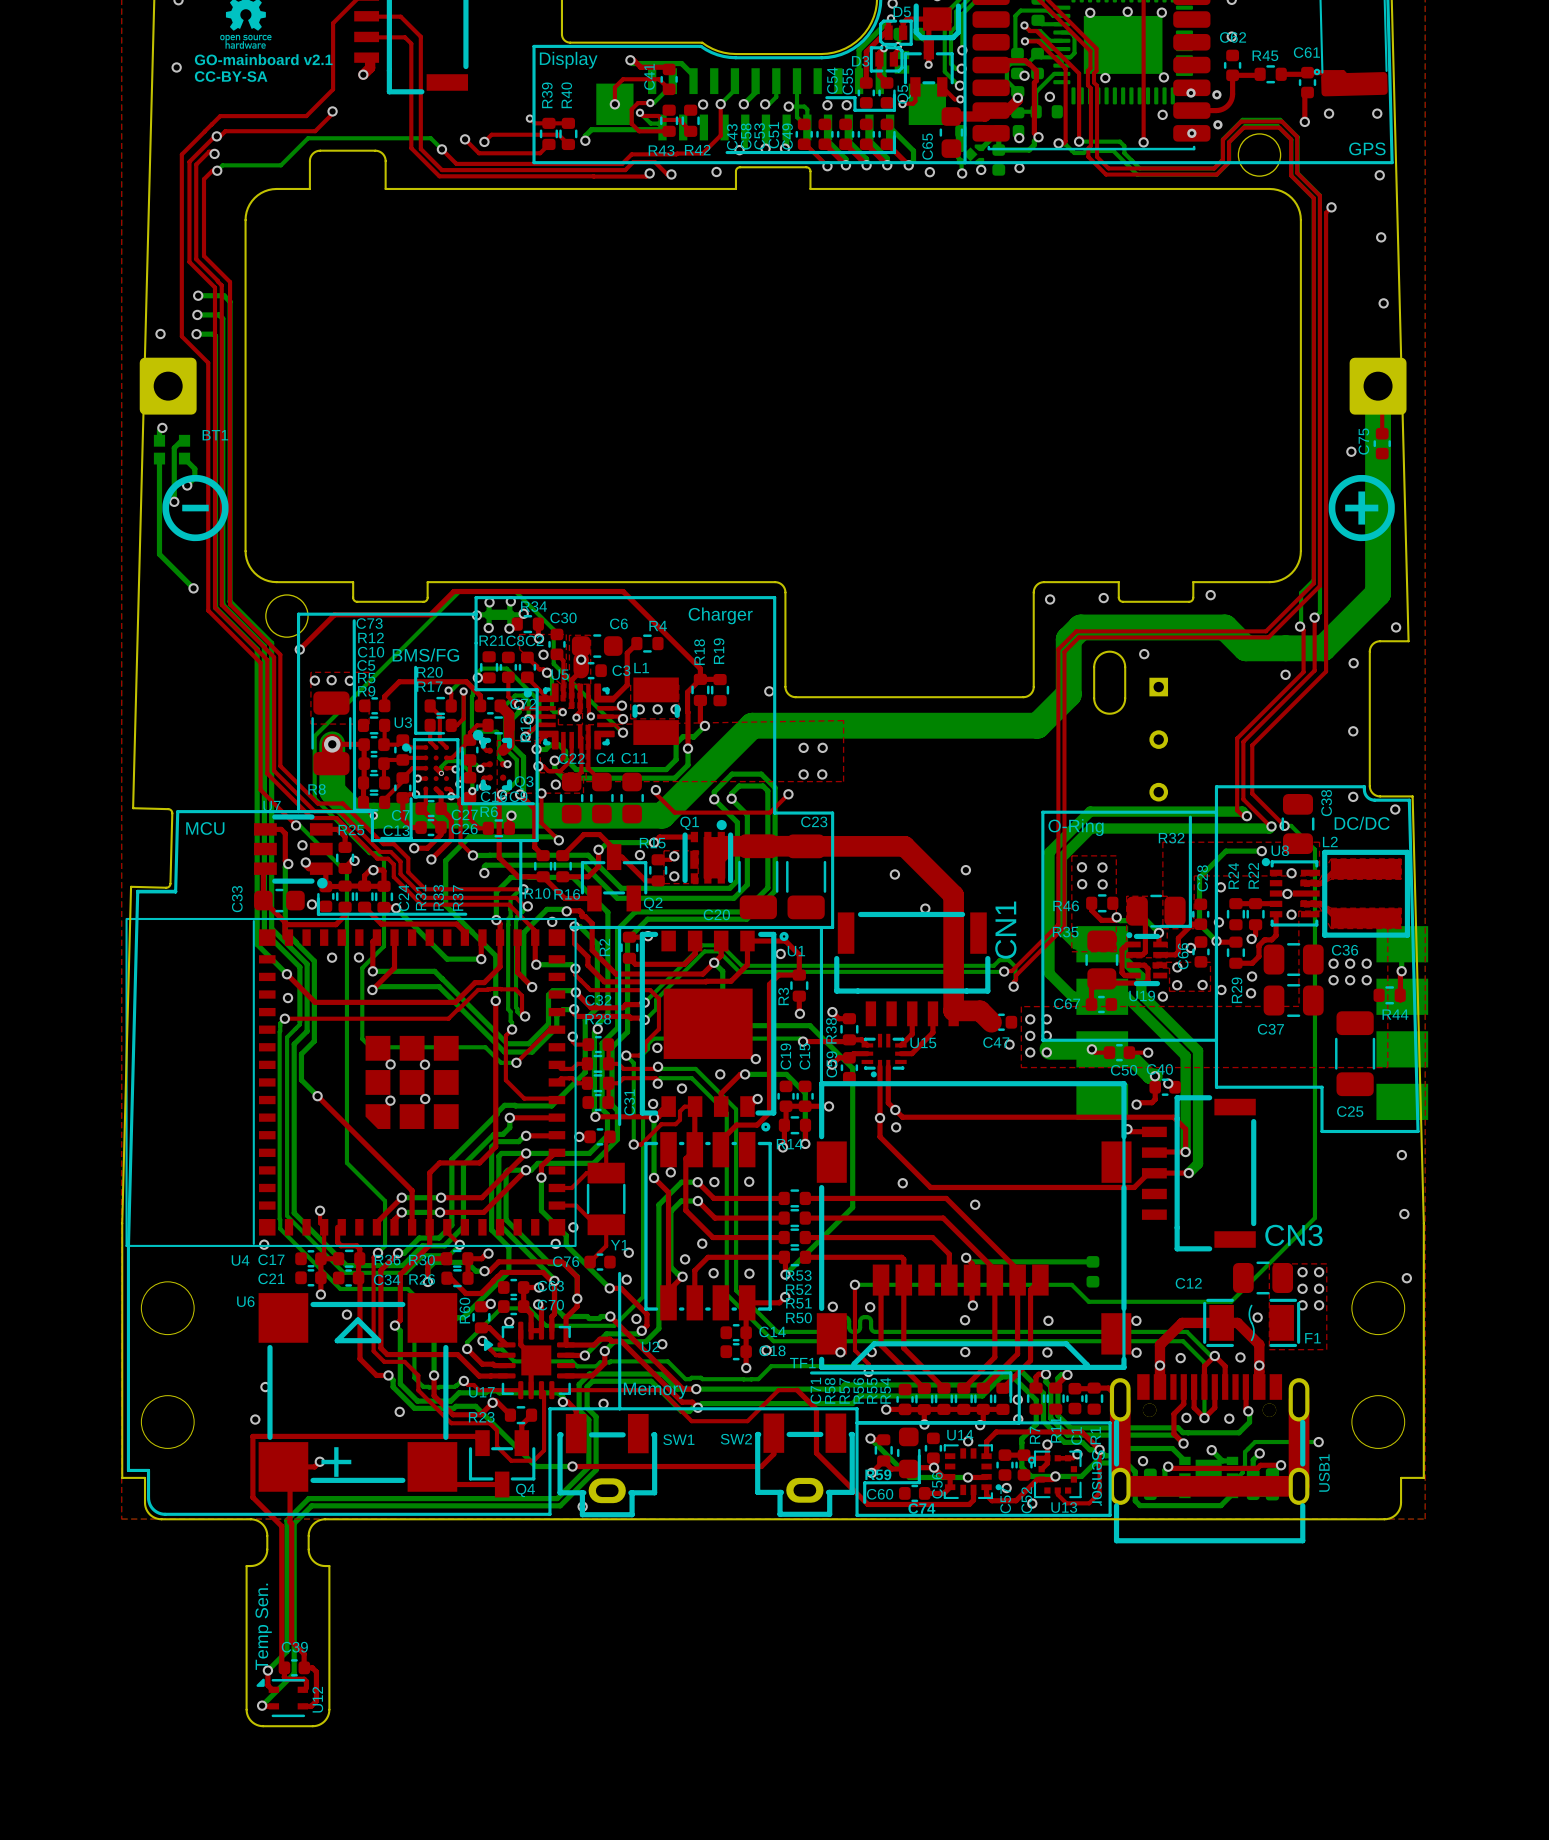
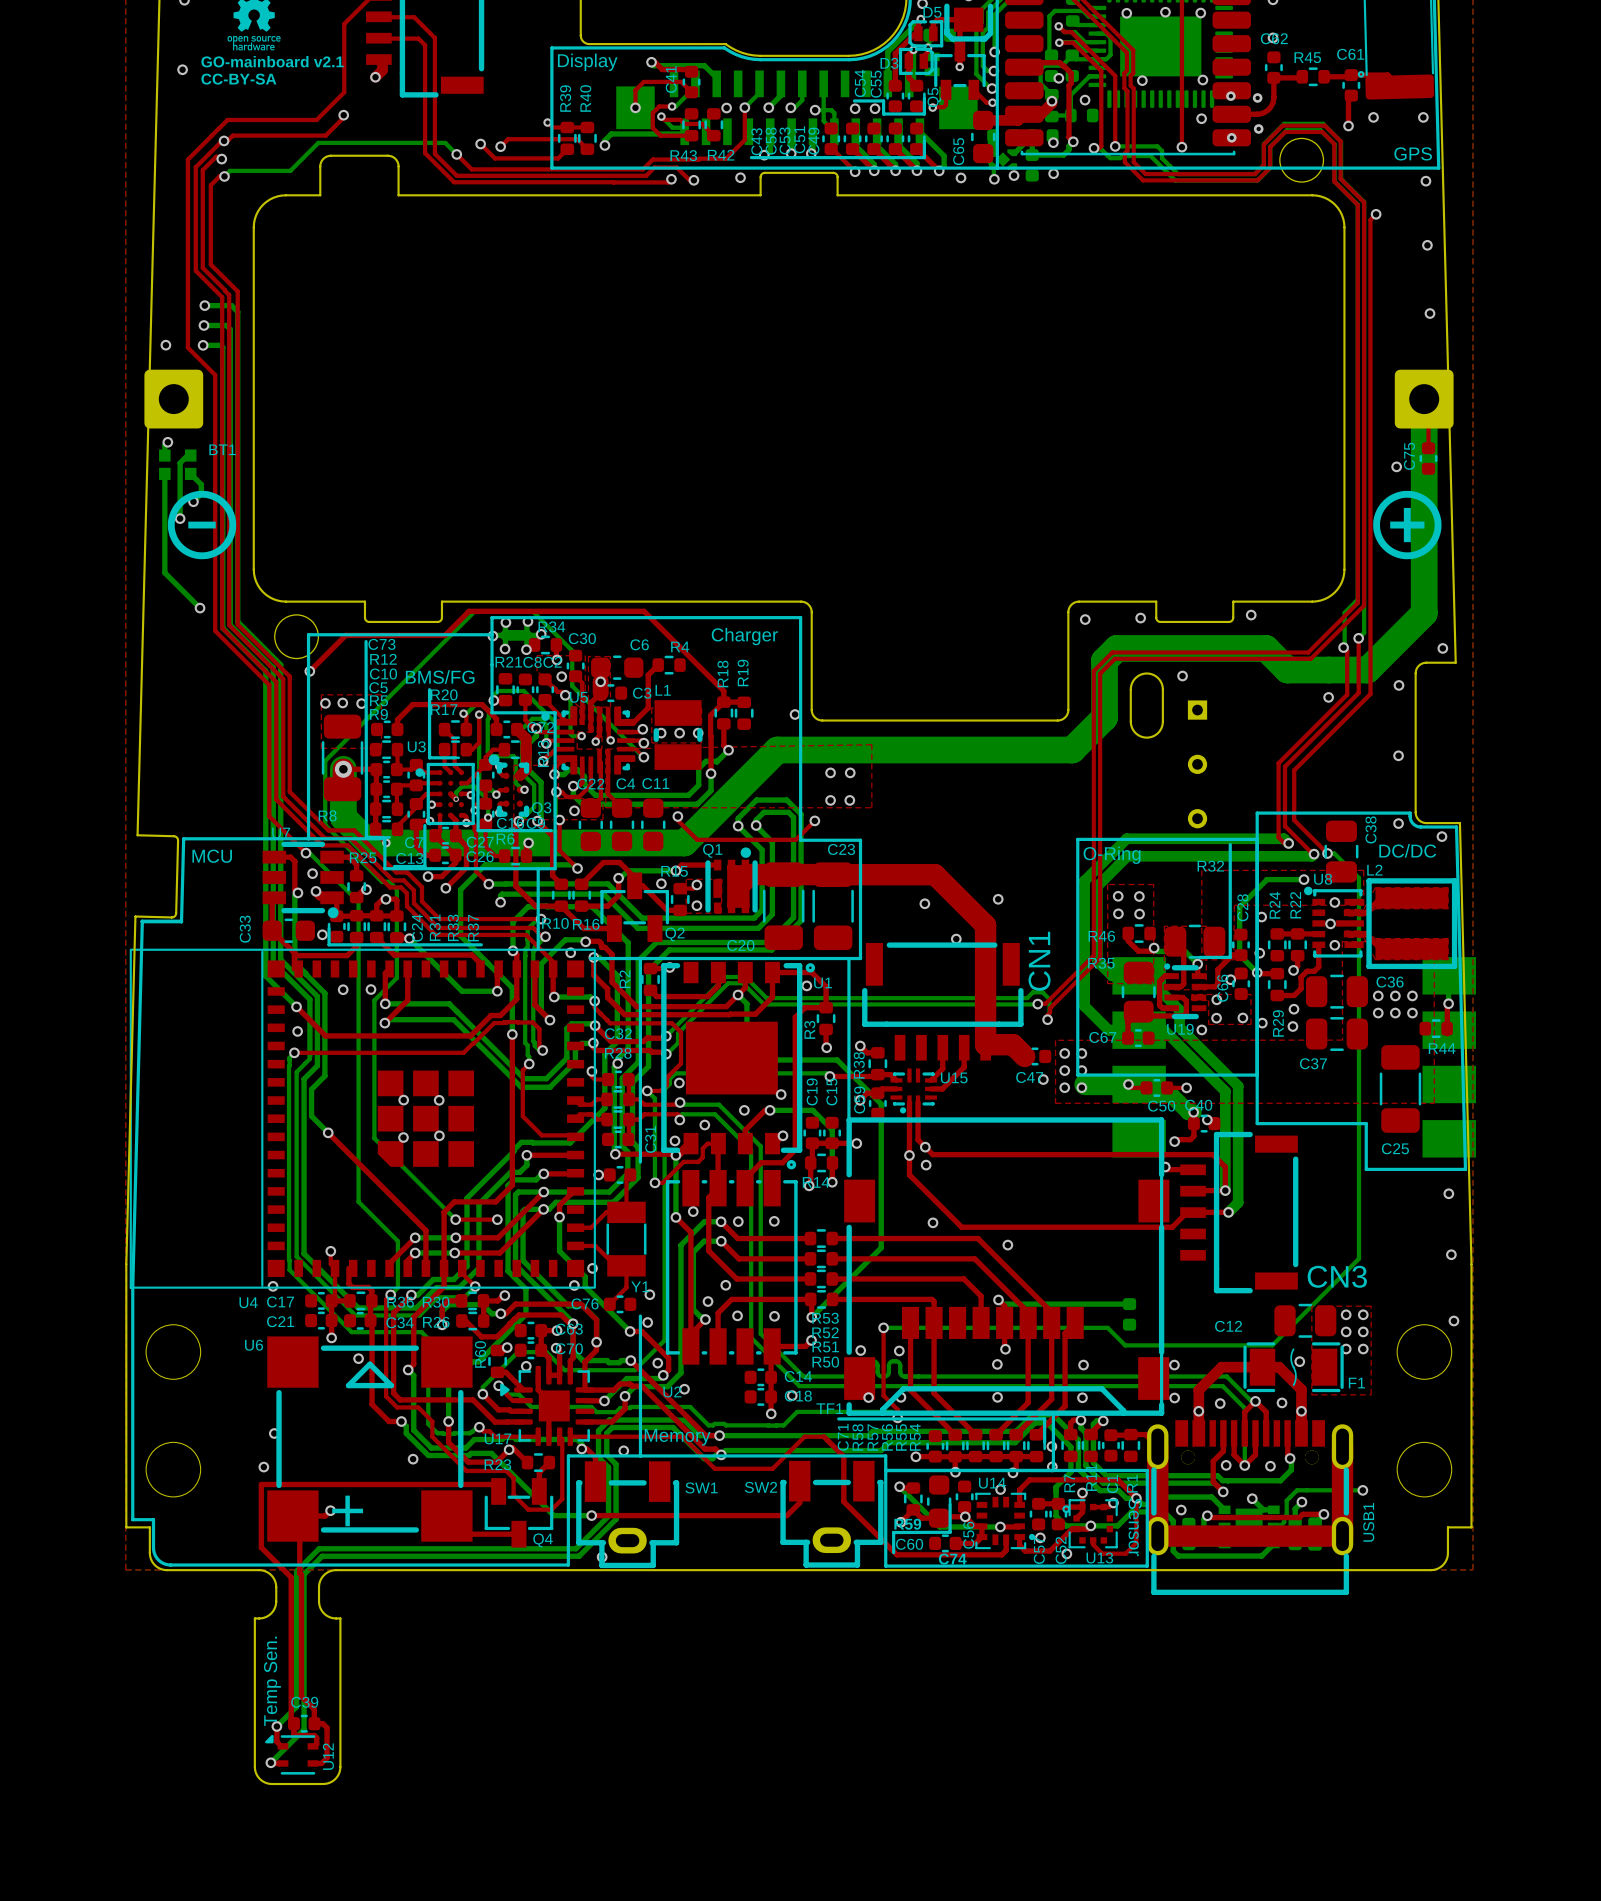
top track: (556, 1029) (549, 1029) (516, 1062) -> none
bottom track: (362, 1039) (370, 1047) (485, 1047) (500, 1062) (516, 1062) -> (374, 1073) (374, 1138) (455, 1219)
via: (516, 1062) -> none
top track: none -> (455, 1219) (497, 1219)
via: none -> (455, 1219)
via: none -> (497, 1219)

